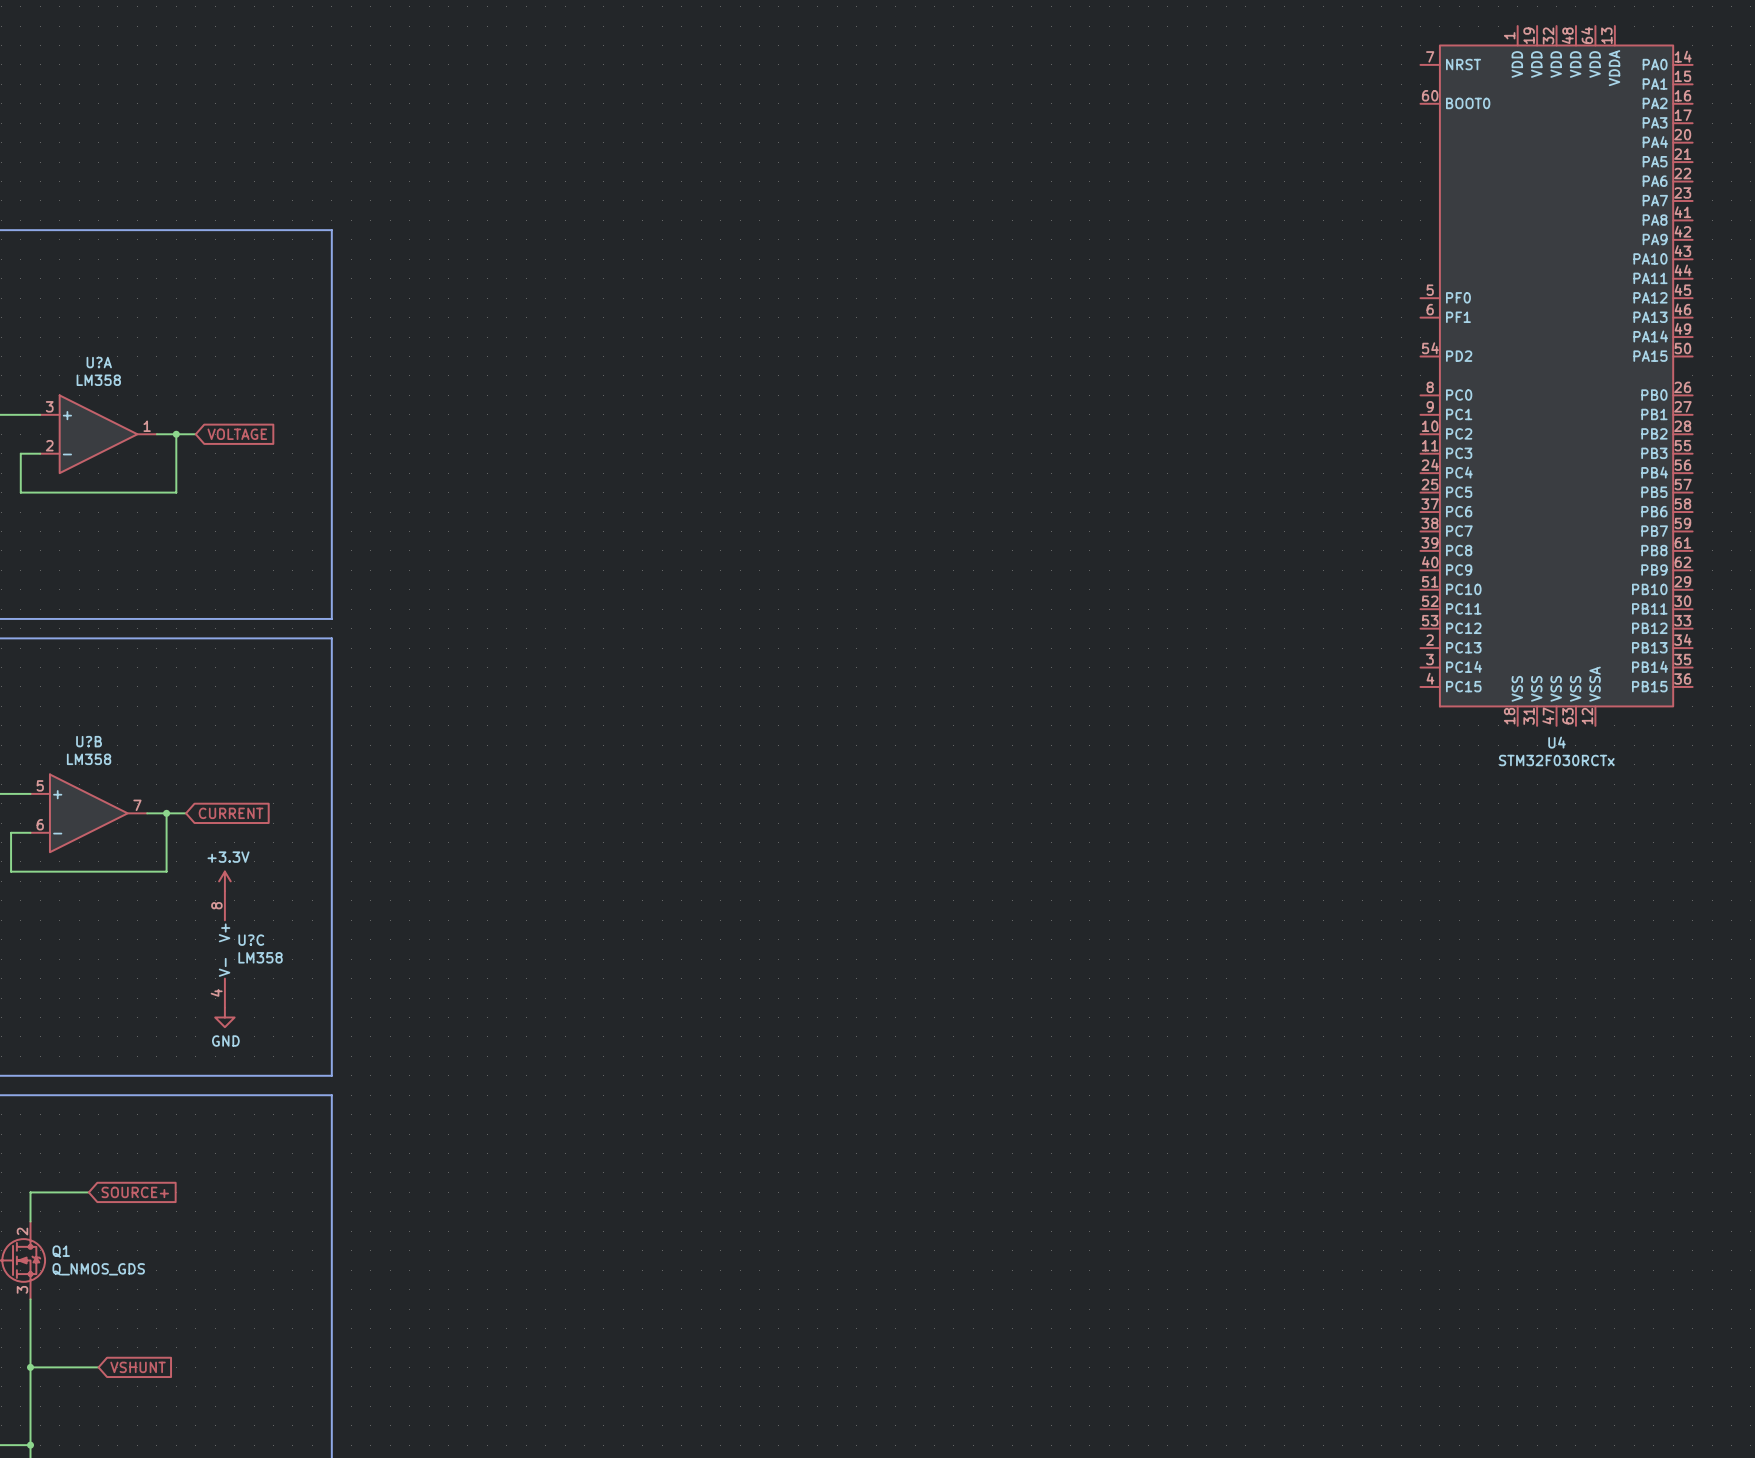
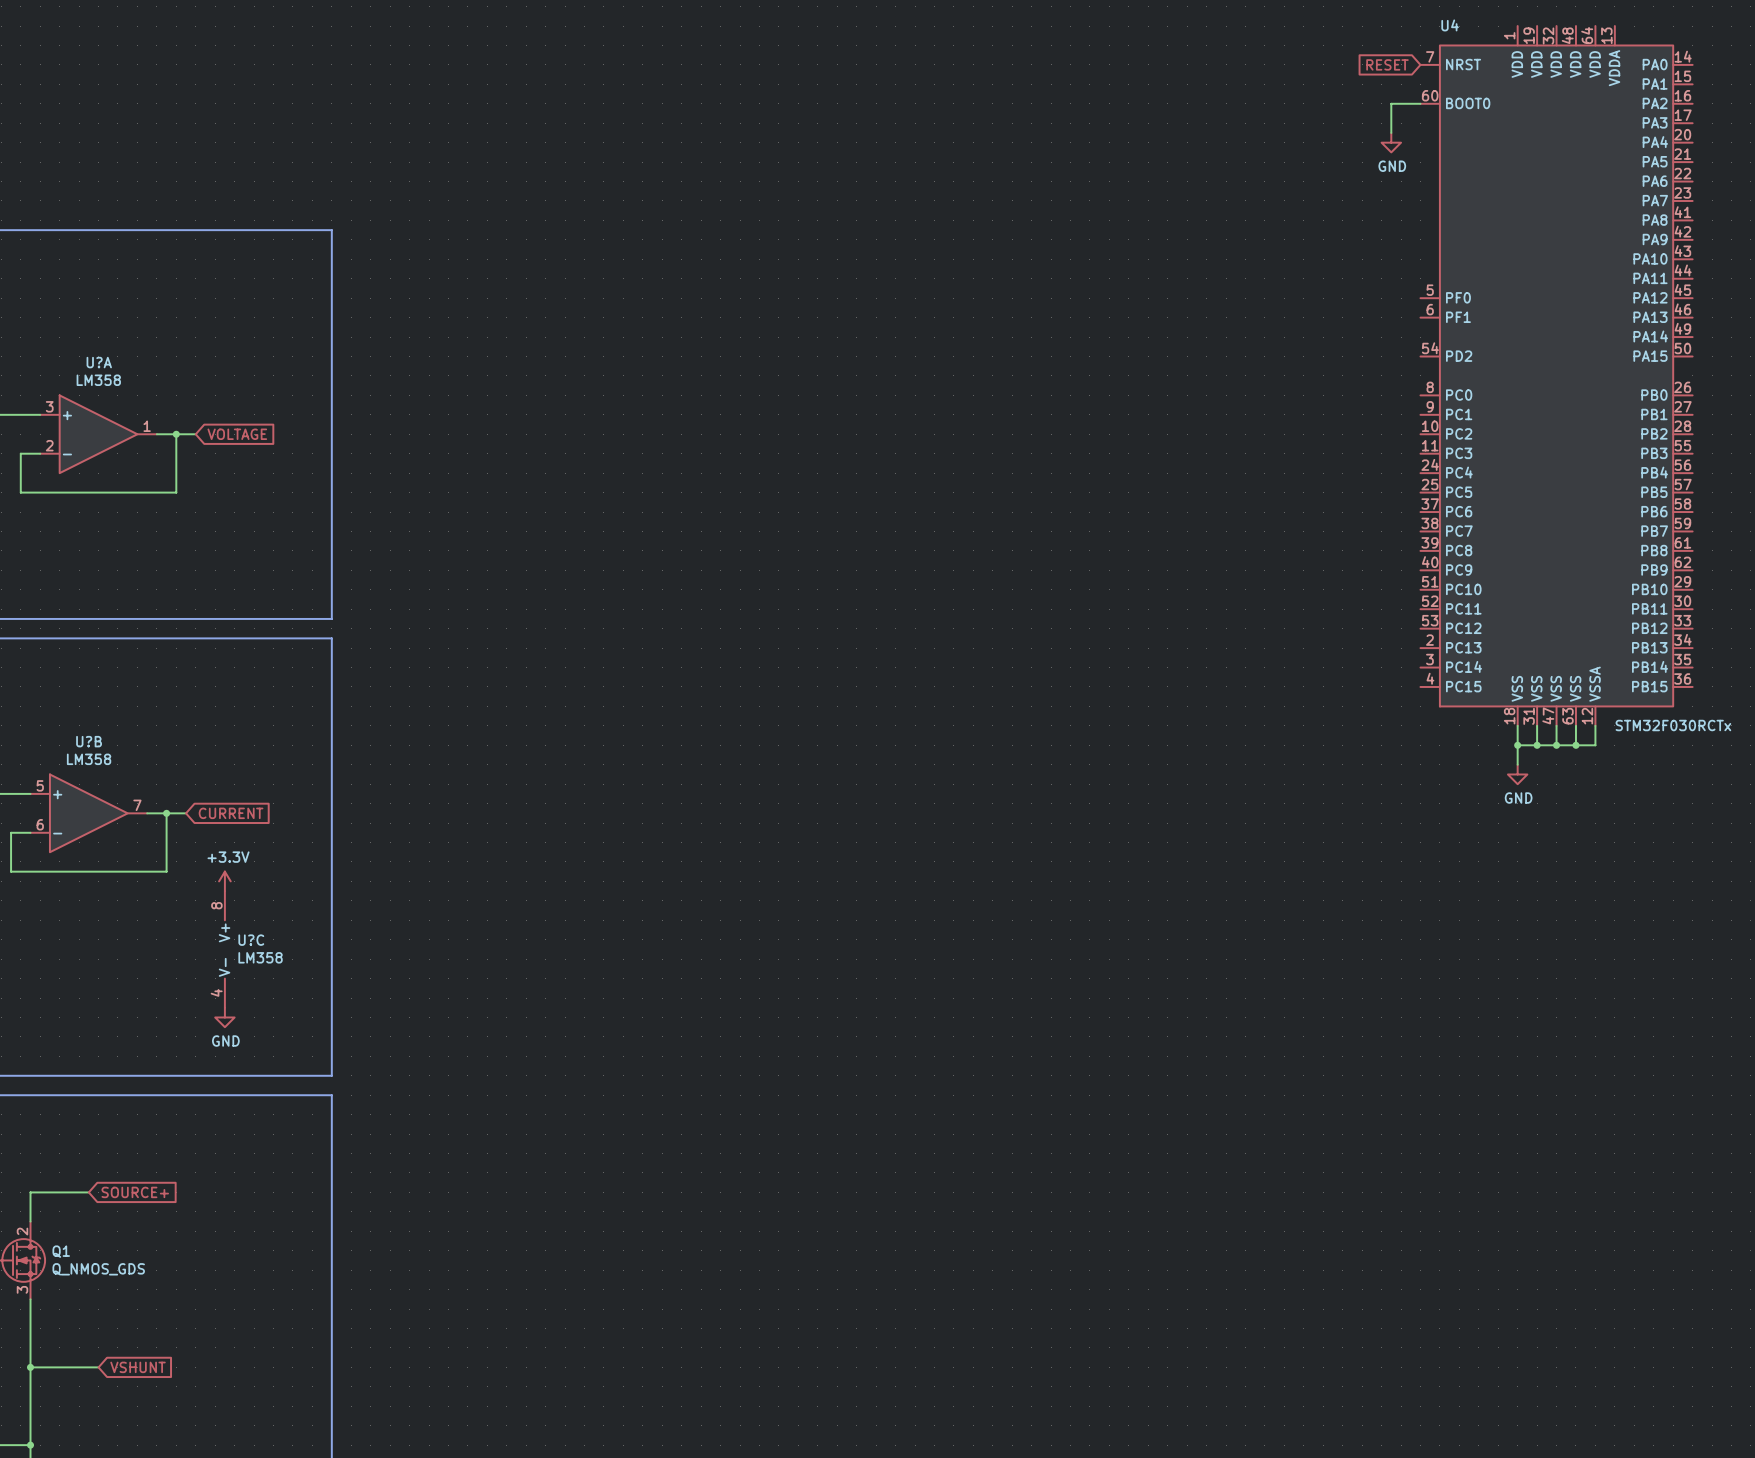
global label: none -> RESET (1387, 64)
wire: none -> (1420, 103) (1391, 103) (1391, 132)
power symbol: none -> GND (1391, 142)
wire: none -> (1517, 725) (1517, 764)
wire: none -> (1537, 725) (1537, 745)
wire: none -> (1556, 725) (1556, 745)
wire: none -> (1575, 725) (1575, 745)
wire: none -> (1595, 725) (1595, 745) (1517, 745)
U4 name position: U4 (1557, 742) -> U4 (1450, 25)
junction: none -> (1517, 745)
junction: none -> (1537, 745)
junction: none -> (1556, 745)
junction: none -> (1575, 745)
U4 value position: STM32F030RCTx (1556, 760) -> STM32F030RCTx (1673, 725)
power symbol: none -> GND (1517, 774)

